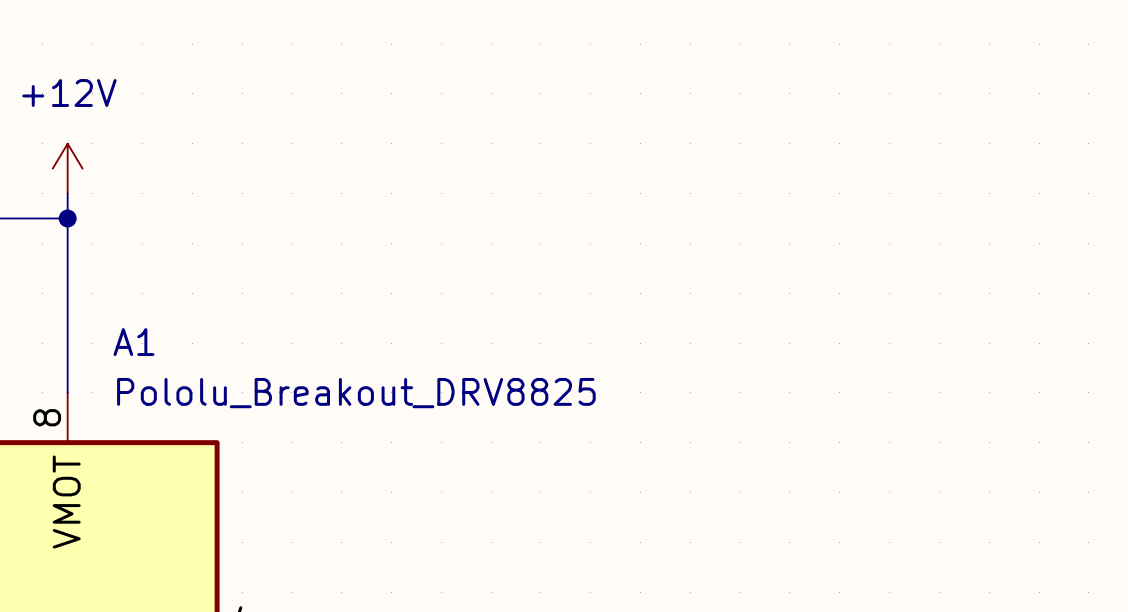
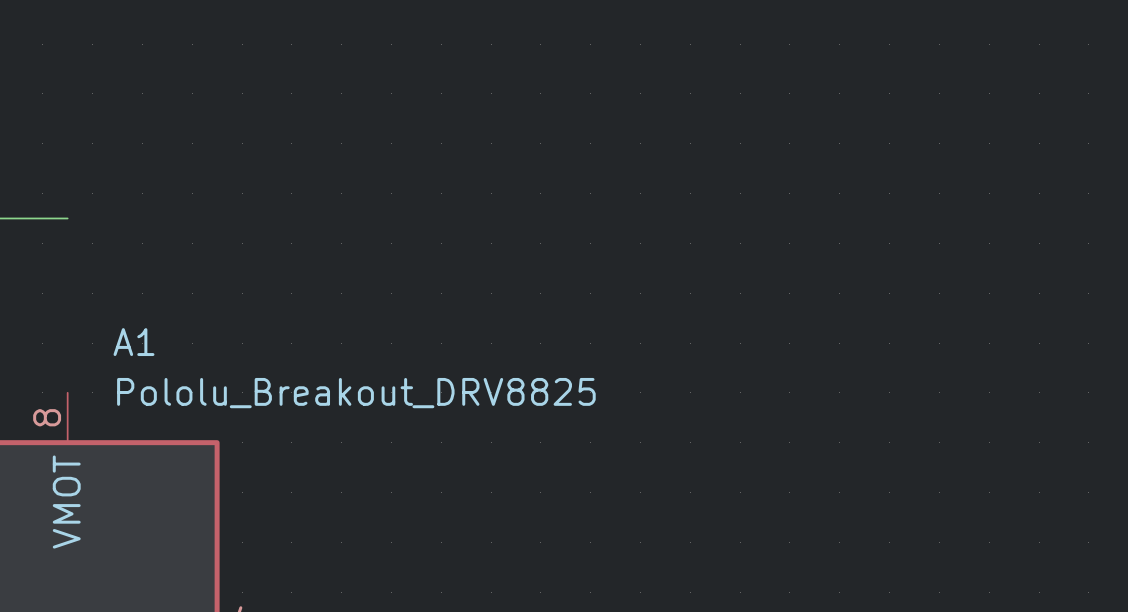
power symbol: +12V (67, 168) -> none
wire: (67, 193) (67, 392) -> none
junction: (67, 218) -> none

